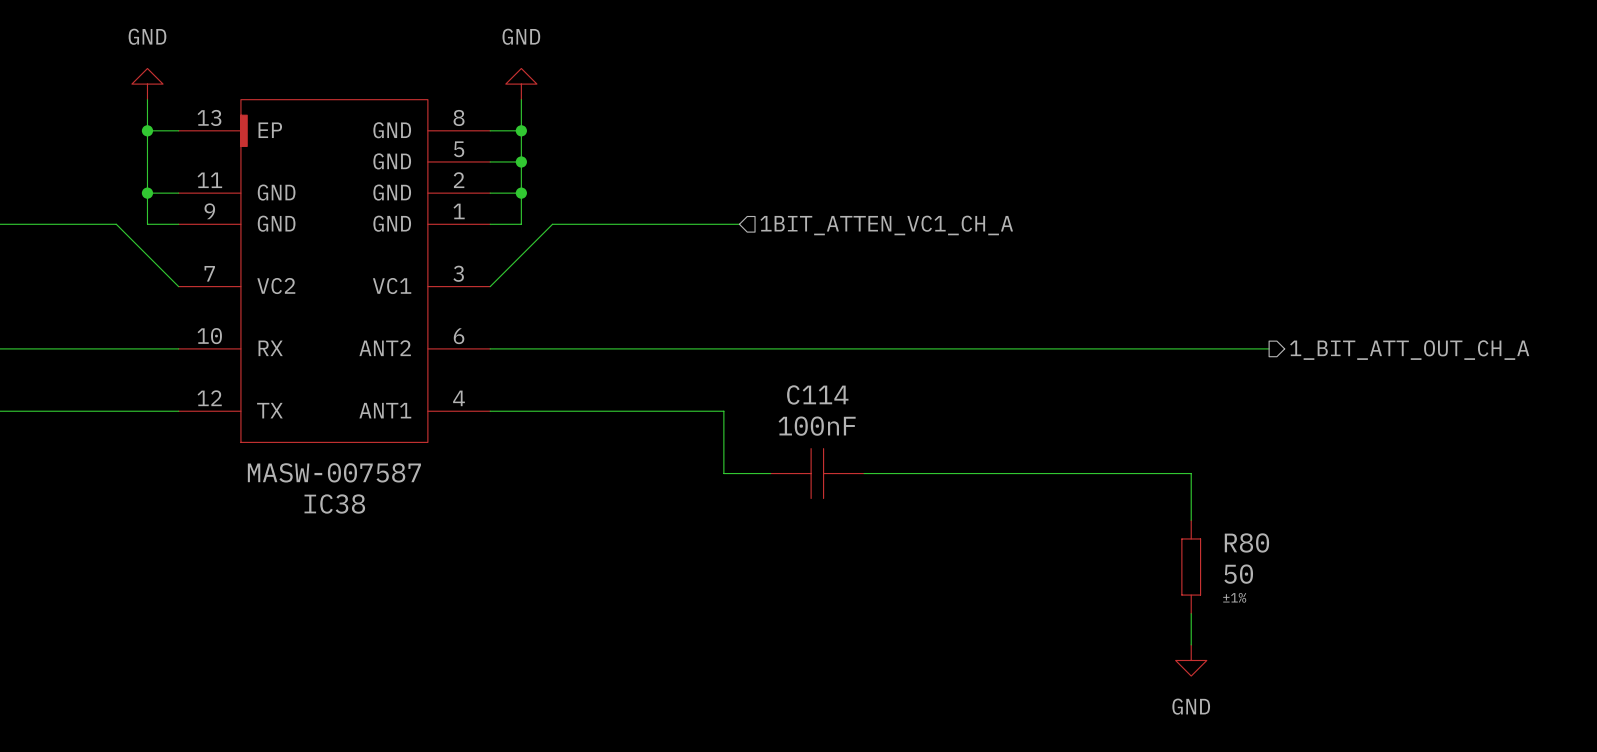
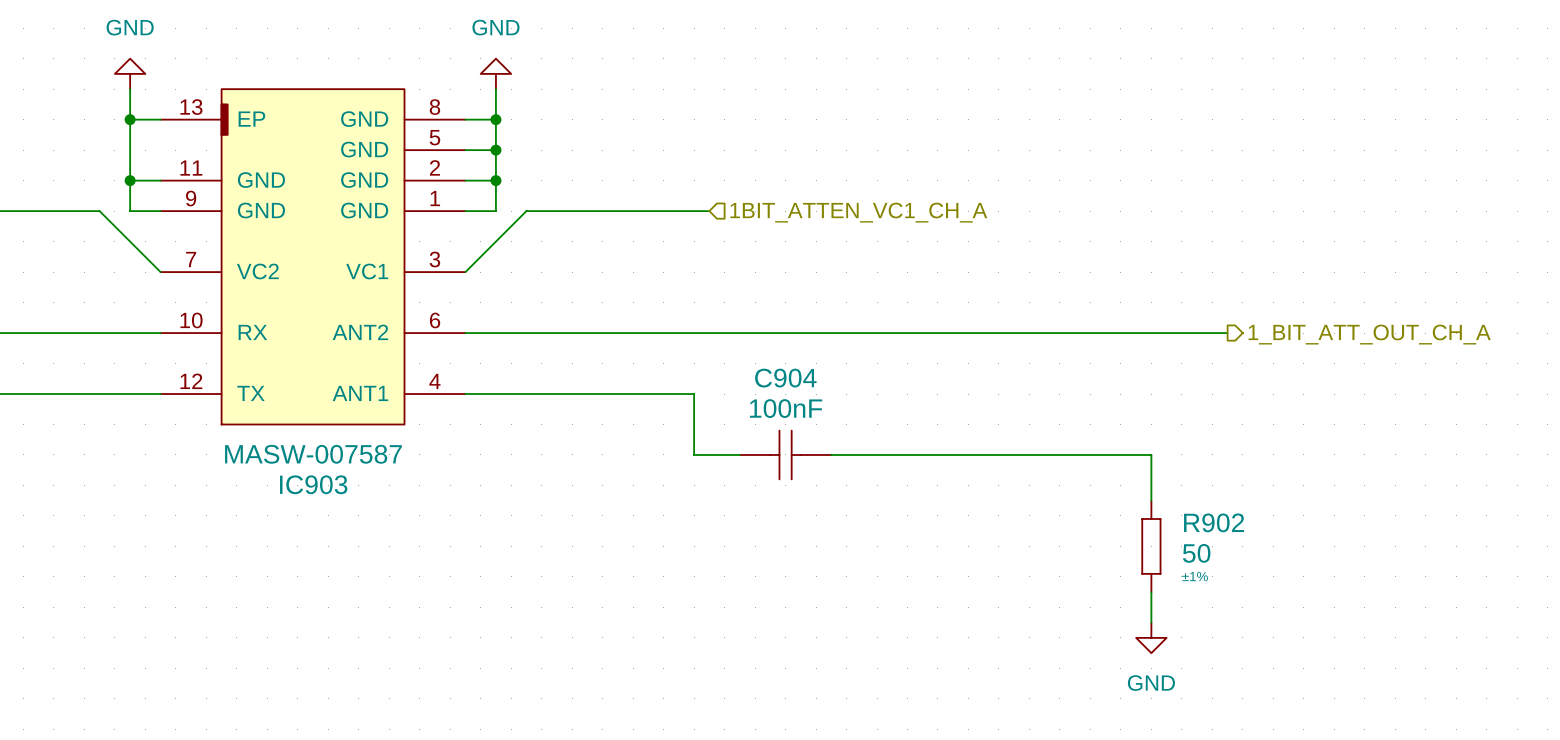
C114 name: C114 (817, 394) -> C904 (785, 378)
IC38 name: IC38 (334, 504) -> IC903 (313, 484)
R80 name: R80 (1246, 542) -> R902 (1214, 522)

